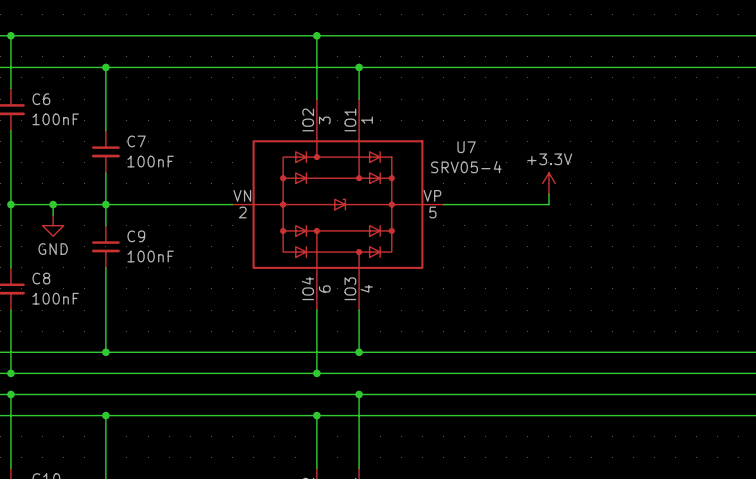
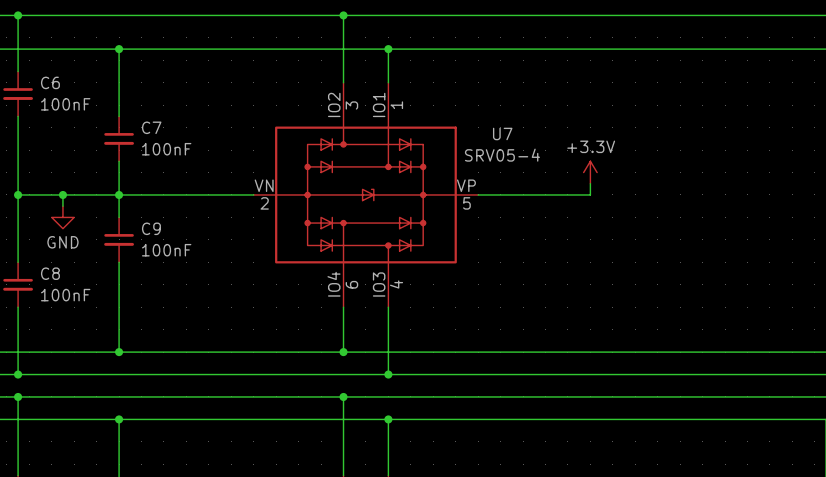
wire: (316, 352) (316, 373) -> (343, 396) (343, 419)
junction: none -> (343, 352)
junction: (359, 352) -> none
junction: (316, 373) -> none
junction: none -> (388, 374)
junction: none -> (343, 396)
wire: (359, 394) (359, 415) -> (388, 352) (388, 374)
junction: (359, 394) -> none
junction: (316, 415) -> none
junction: none -> (388, 419)

